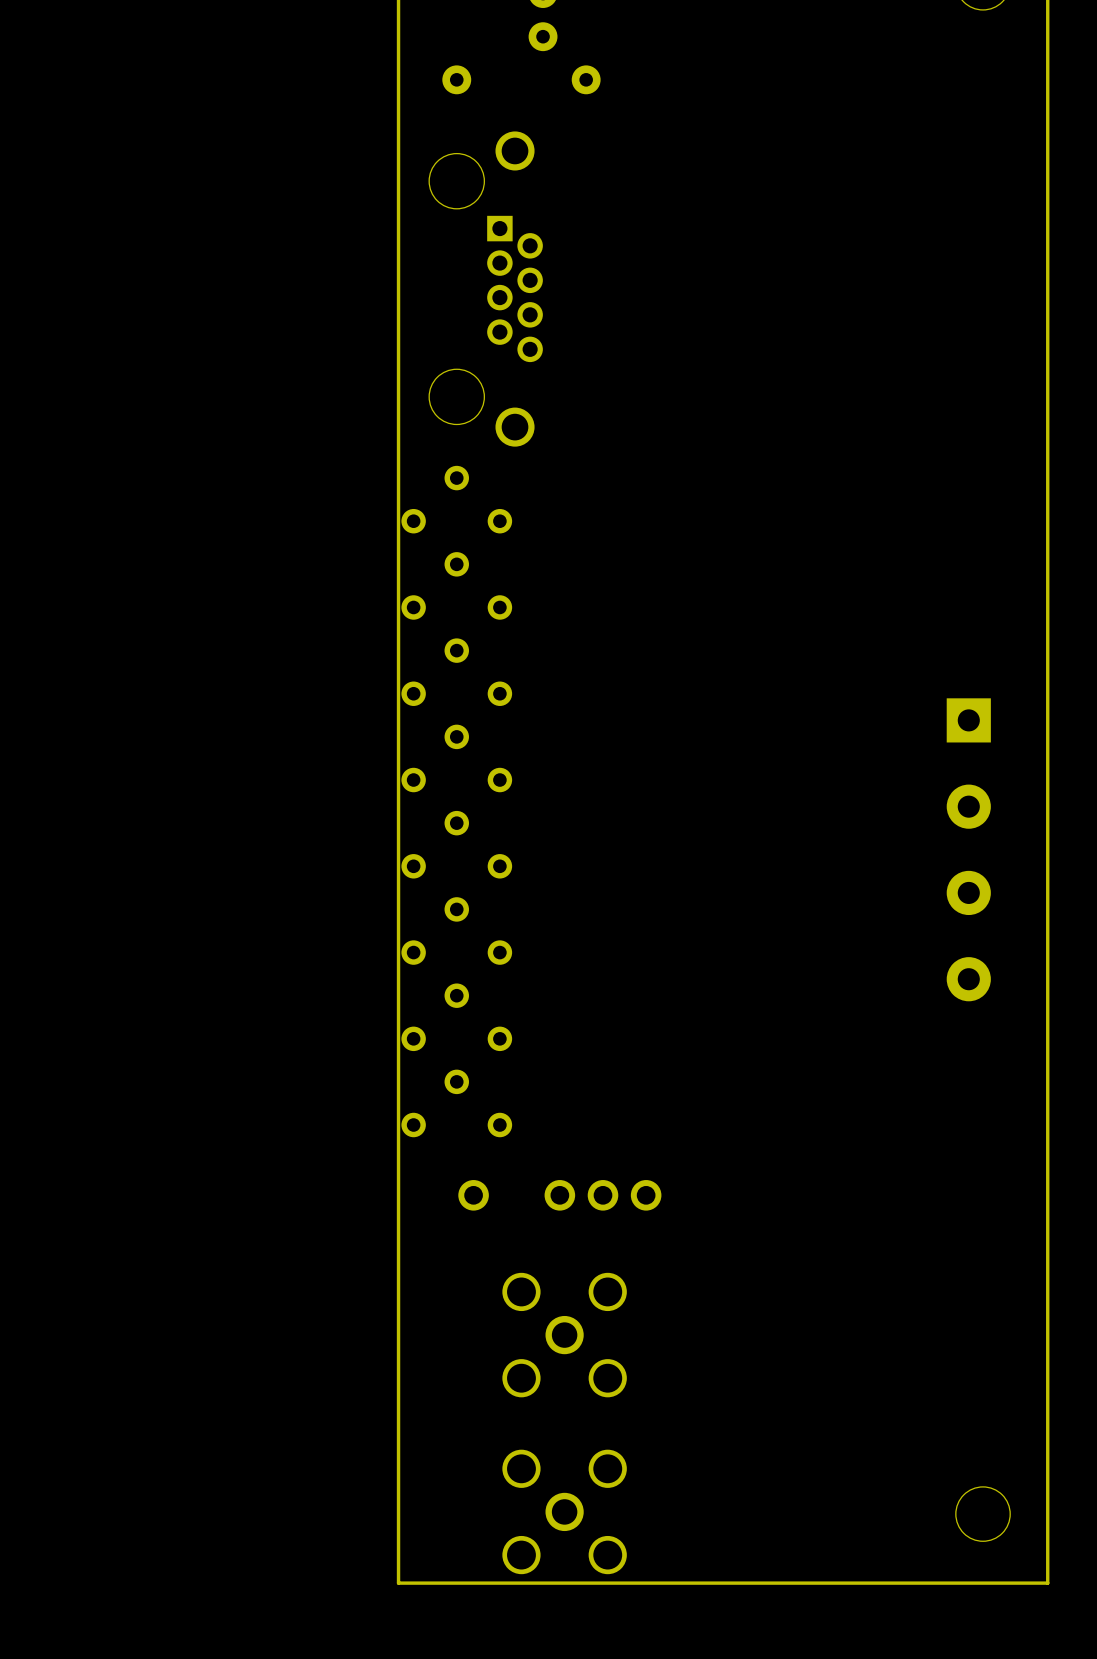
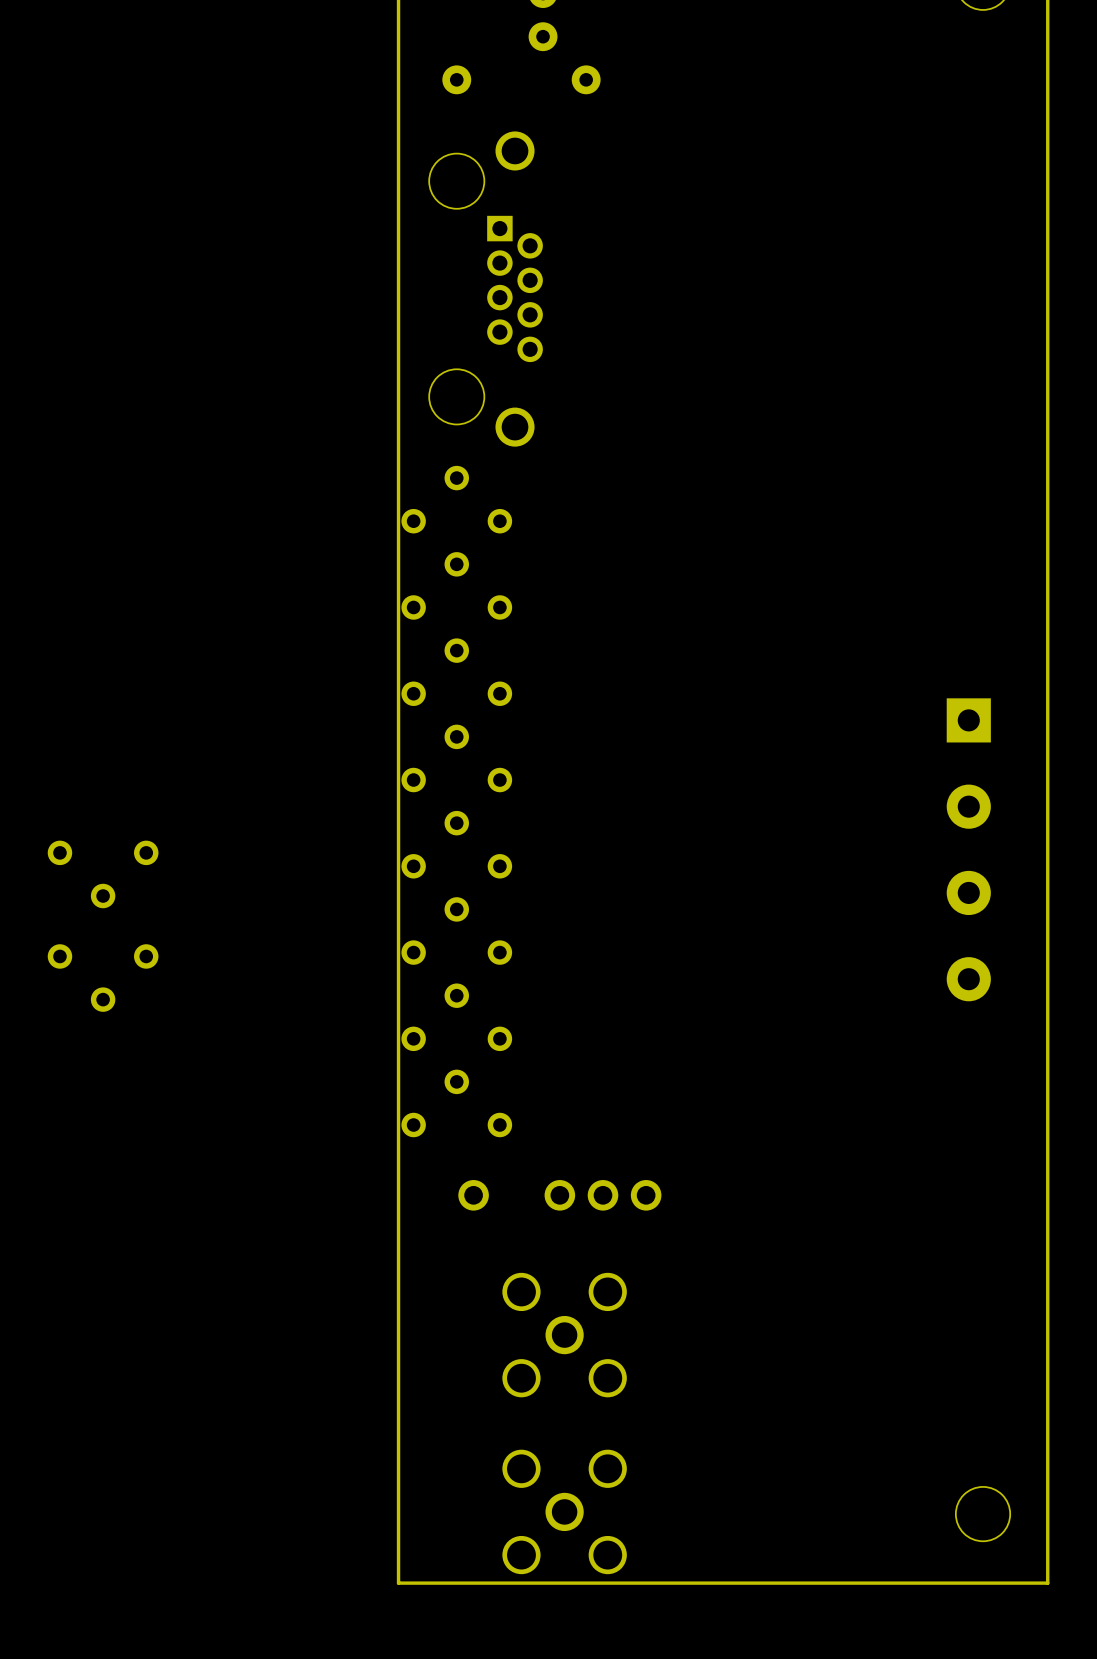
part: none -> (103, 874)
part: none -> (103, 978)

